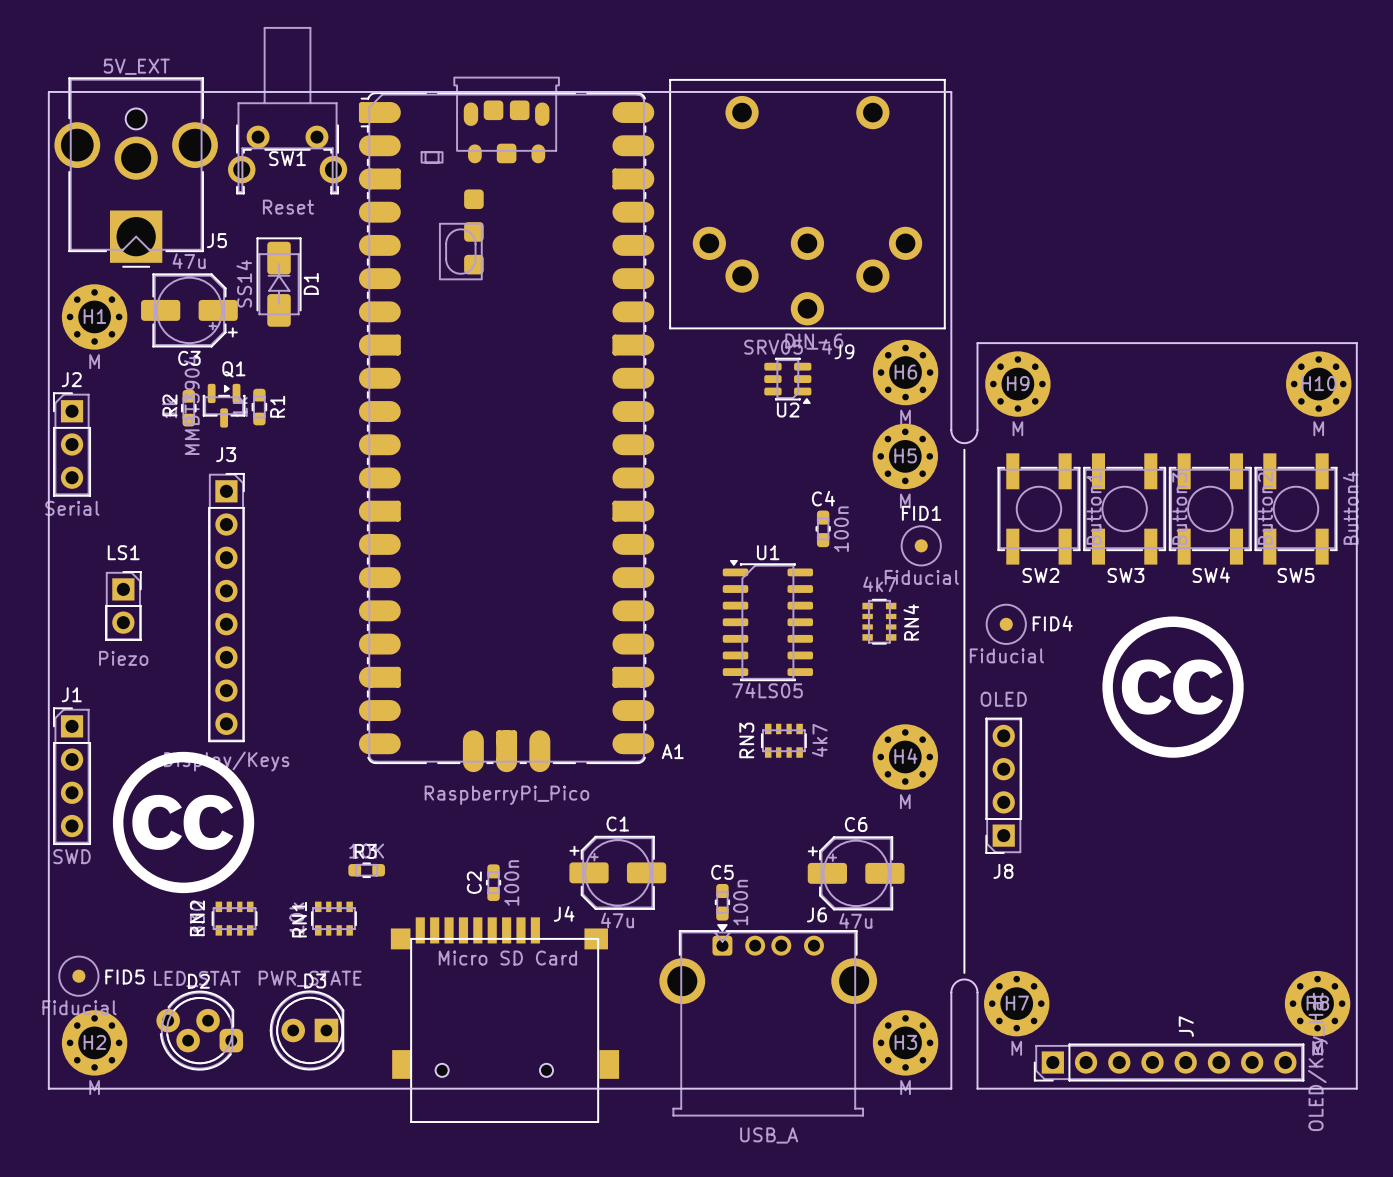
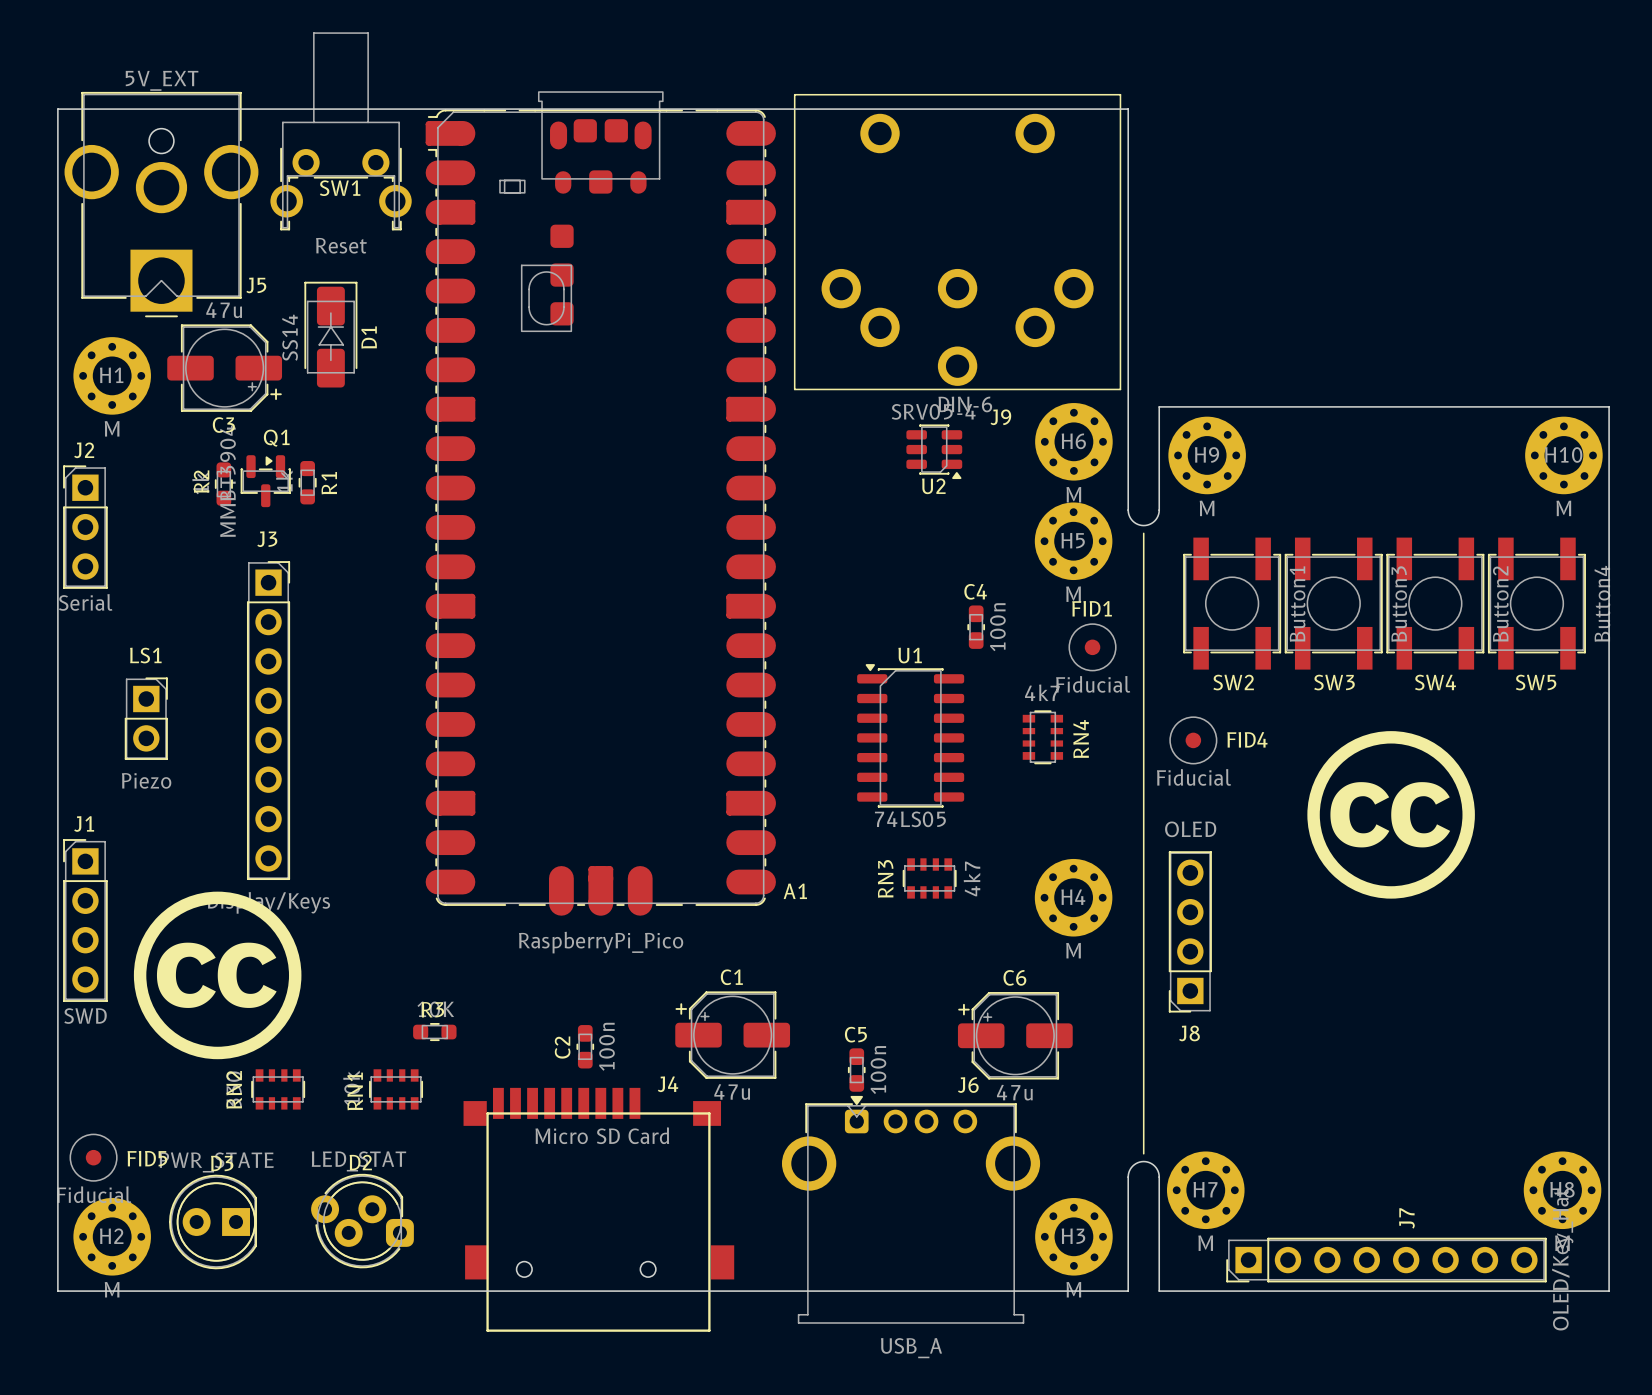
D2 position: (199, 1030) -> (362, 1221)
D3 position: (307, 1030) -> (213, 1222)

